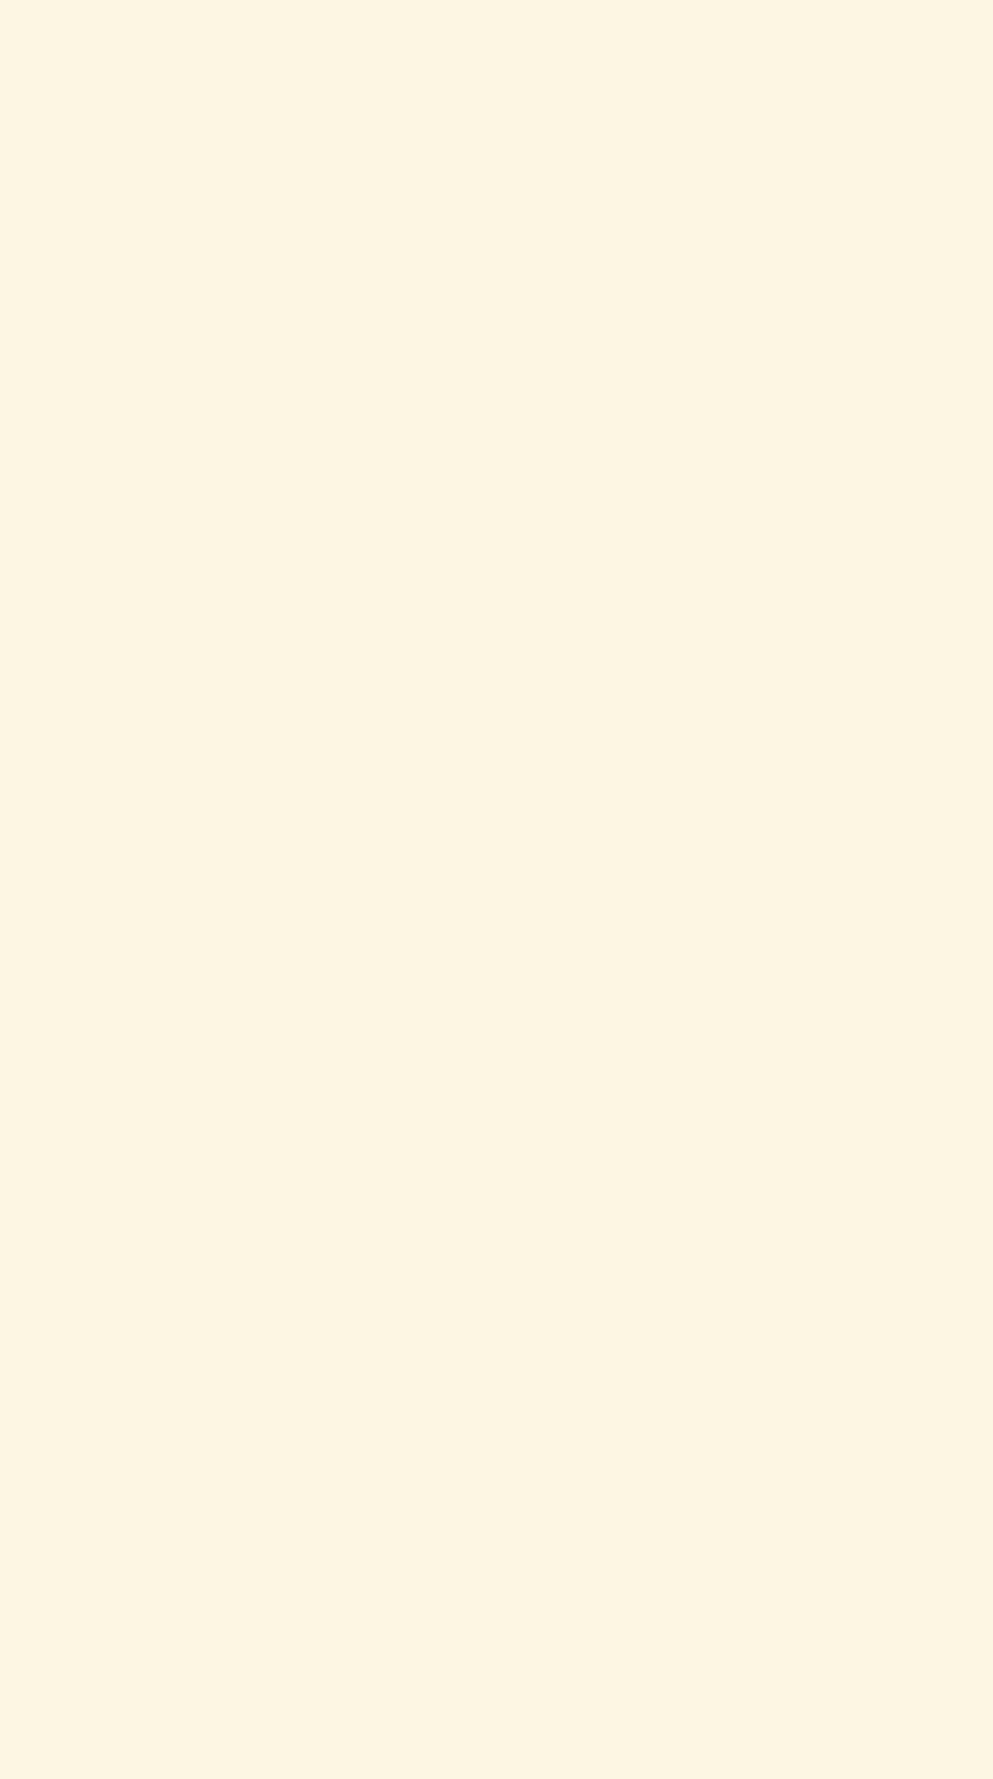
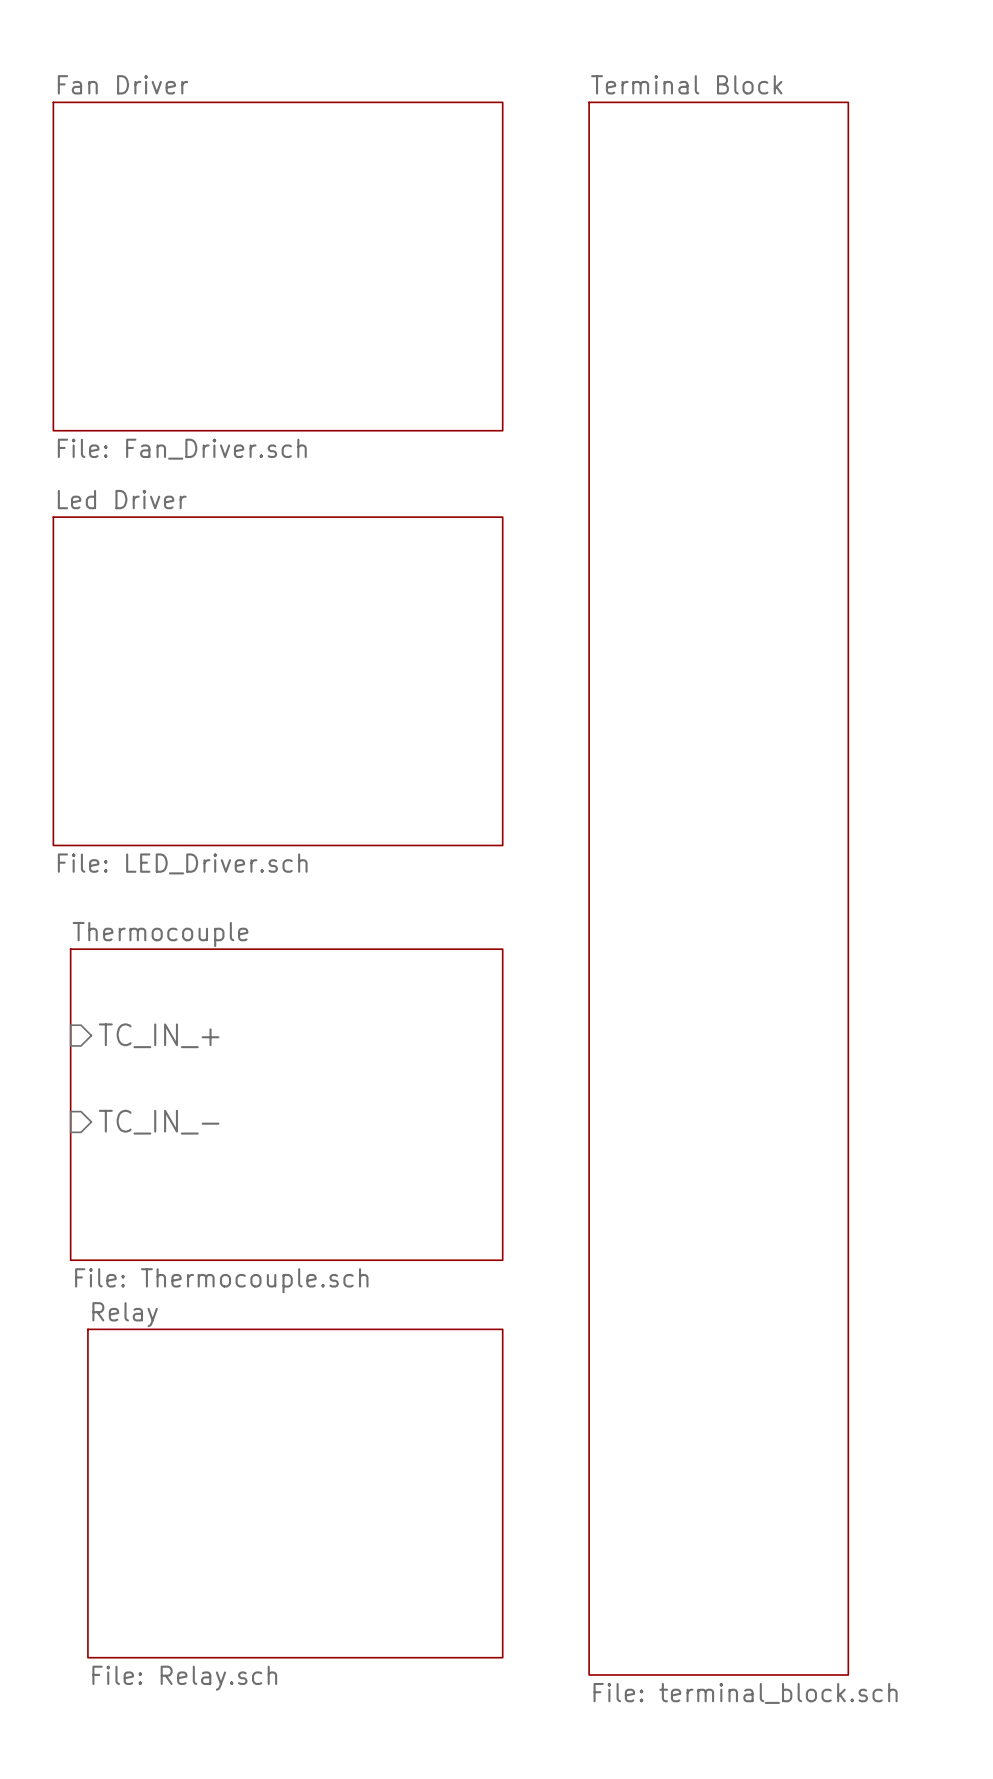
sheet Fan Driver: none -> File: Fan_Driver.sch (278, 266)
sheet Led Driver: none -> File: LED_Driver.sch (278, 681)
sheet Terminal Block: none -> File: terminal_block.sch (718, 888)
sheet pin: none -> TC_IN_+ (159, 1035)
sheet Thermocouple: none -> File: Thermocouple.sch (286, 1104)
sheet pin: none -> TC_IN_- (159, 1122)
sheet Relay: none -> File: Relay.sch (295, 1493)

